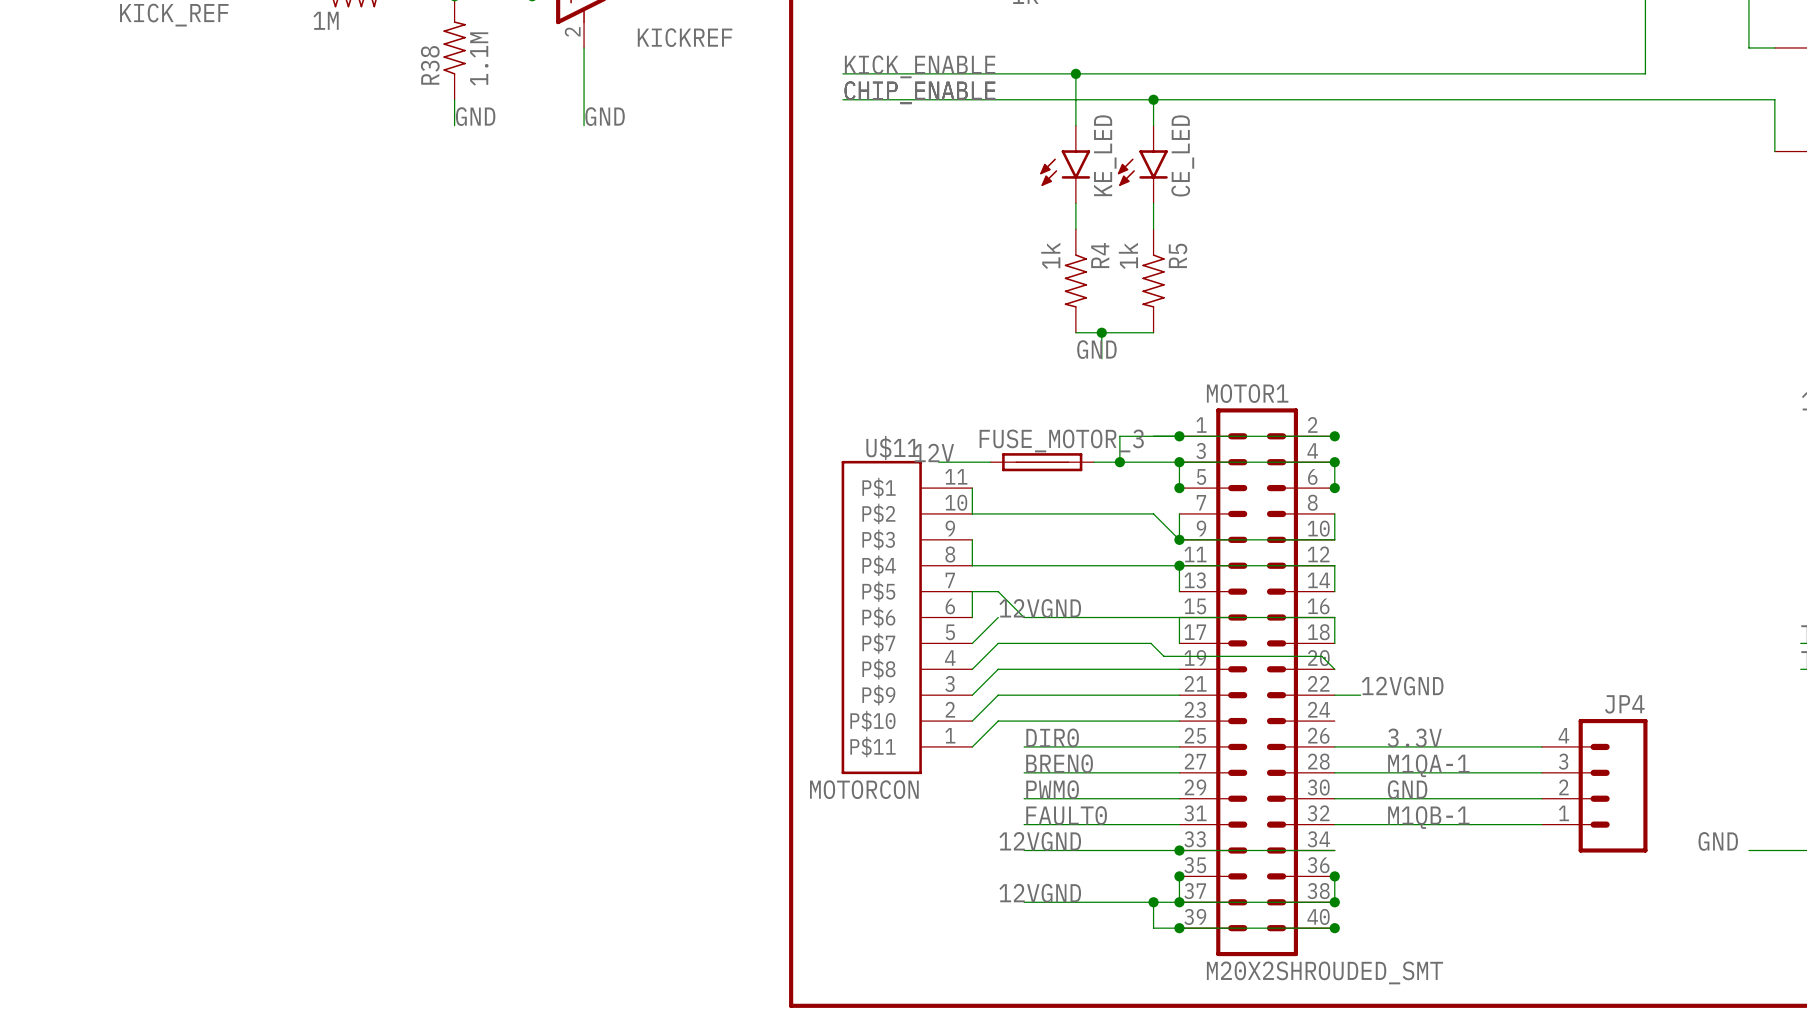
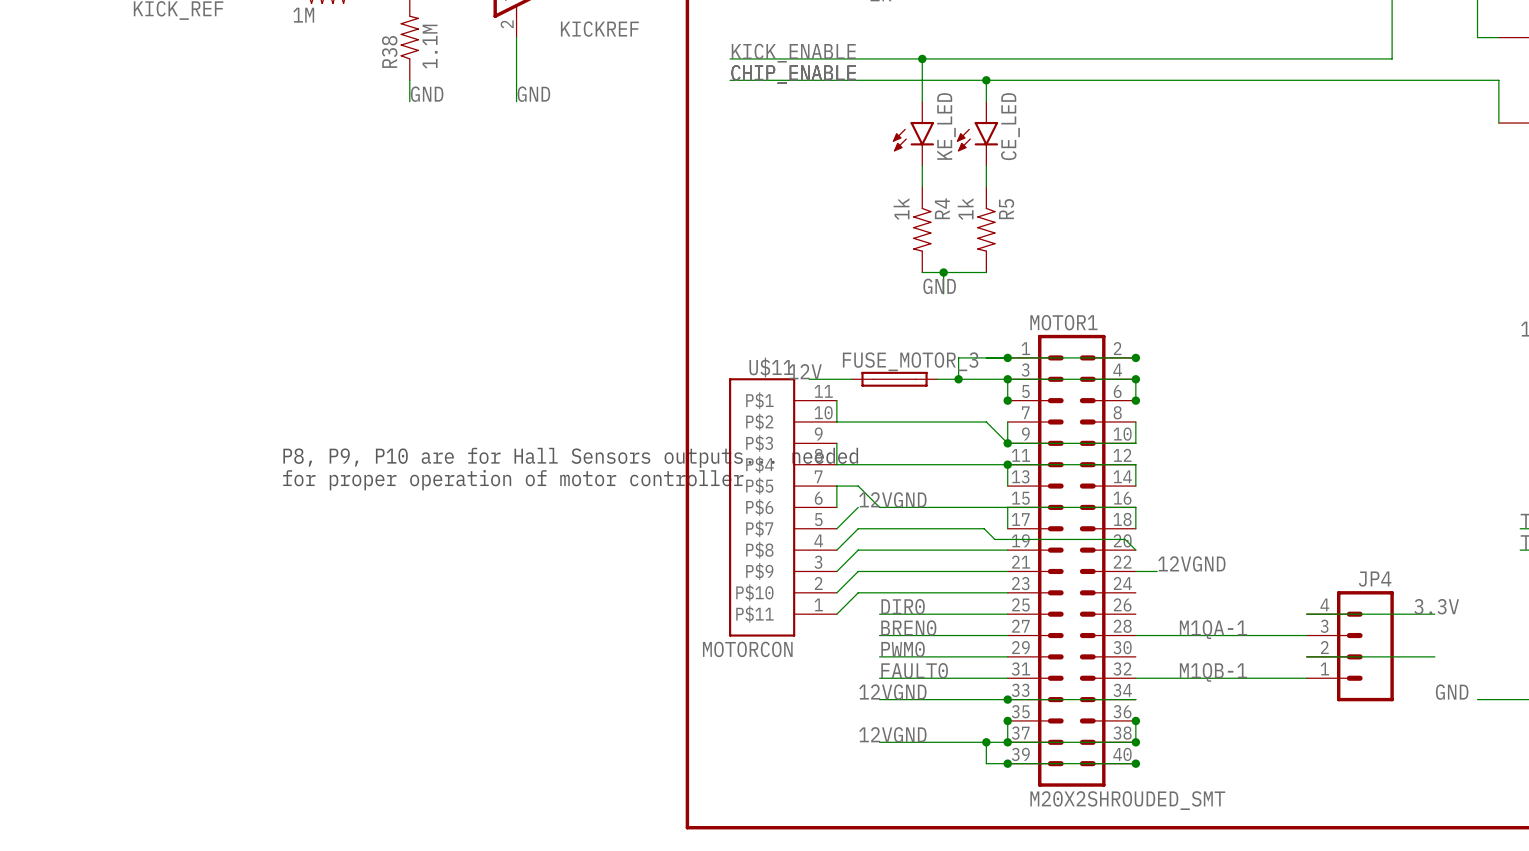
text: none -> P8, P9, P10 are for Hall Sensors outputs... needed (570, 457)
text: none -> for proper operation of motor controller (513, 480)
label: 3.3V (1414, 737) -> none
label: none -> 3.3V (1436, 606)
wire: (1334, 746) (1541, 746) -> (1434, 614) (1306, 614)
label: GND (1407, 789) -> none
wire: (1334, 798) (1541, 798) -> (1434, 656) (1306, 656)

